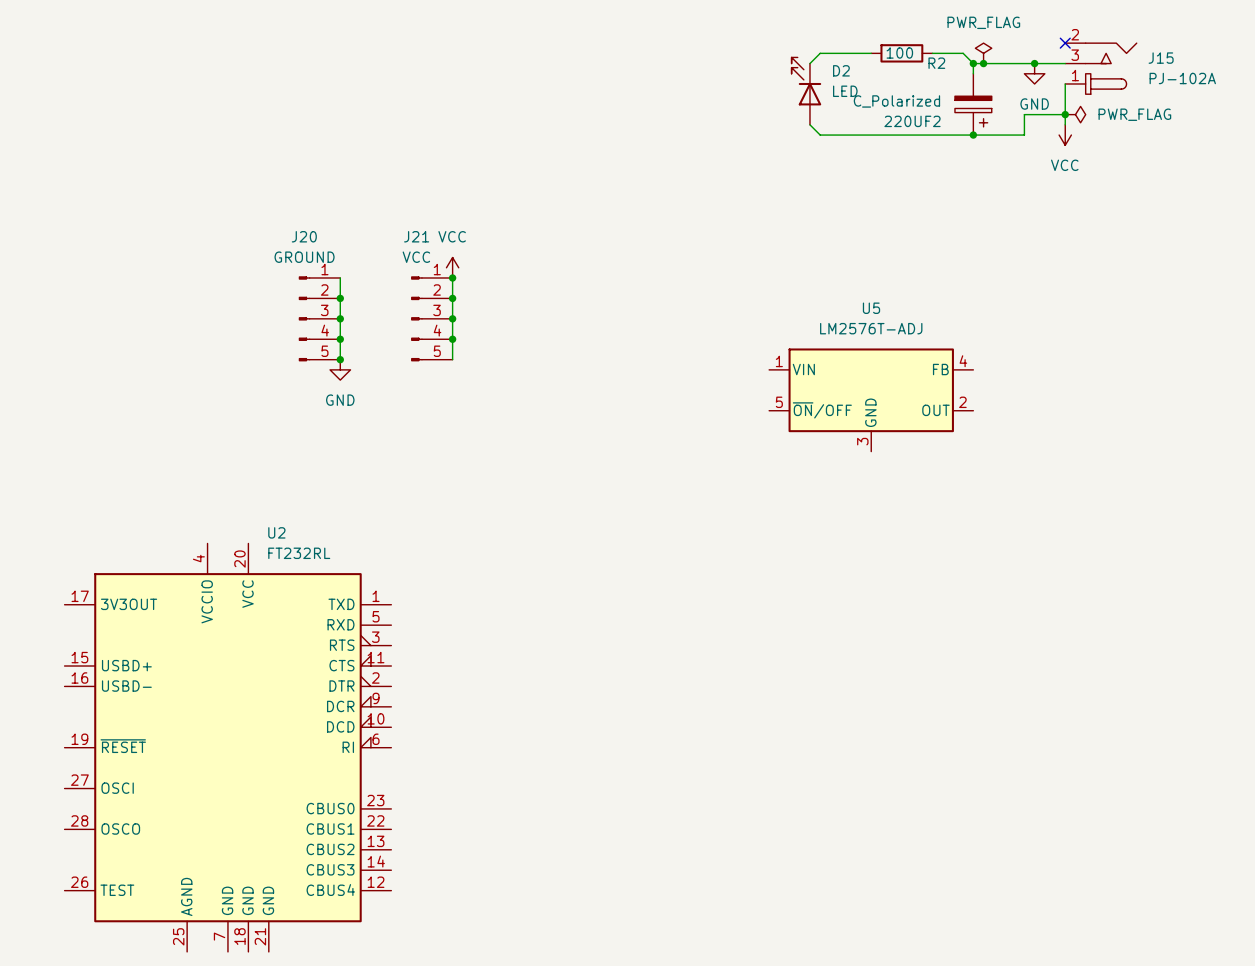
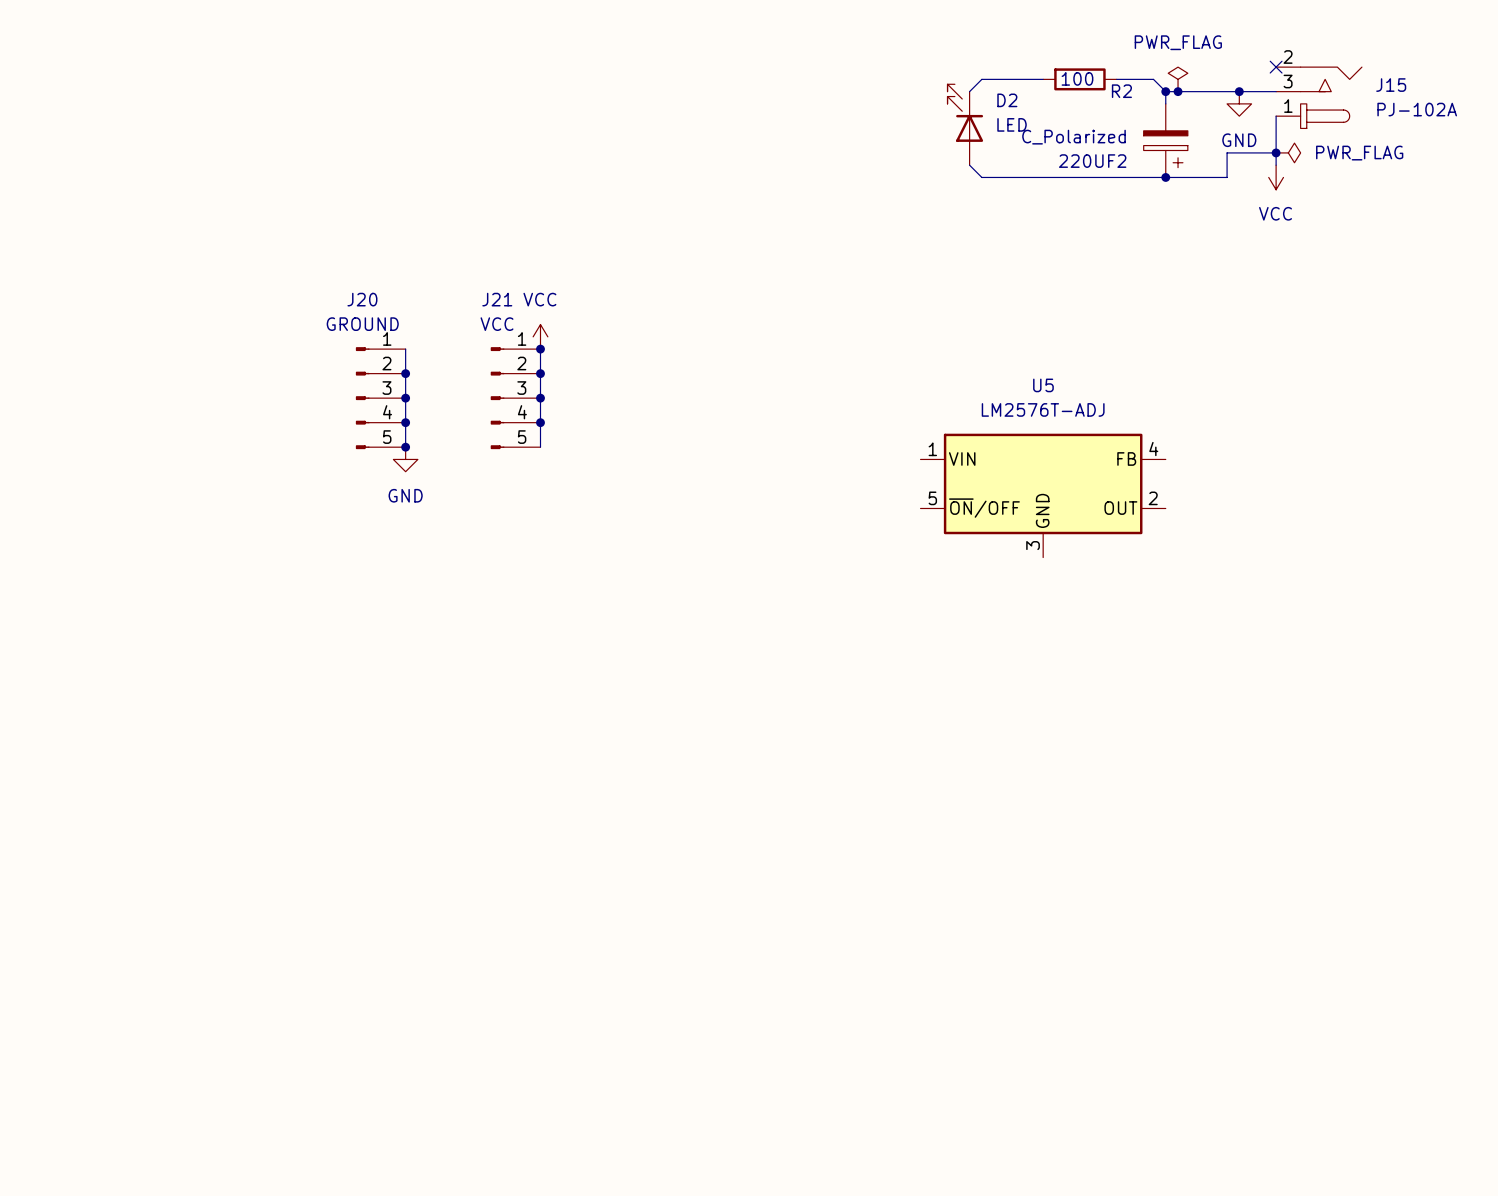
U2: FT232RL (227, 747) -> none

